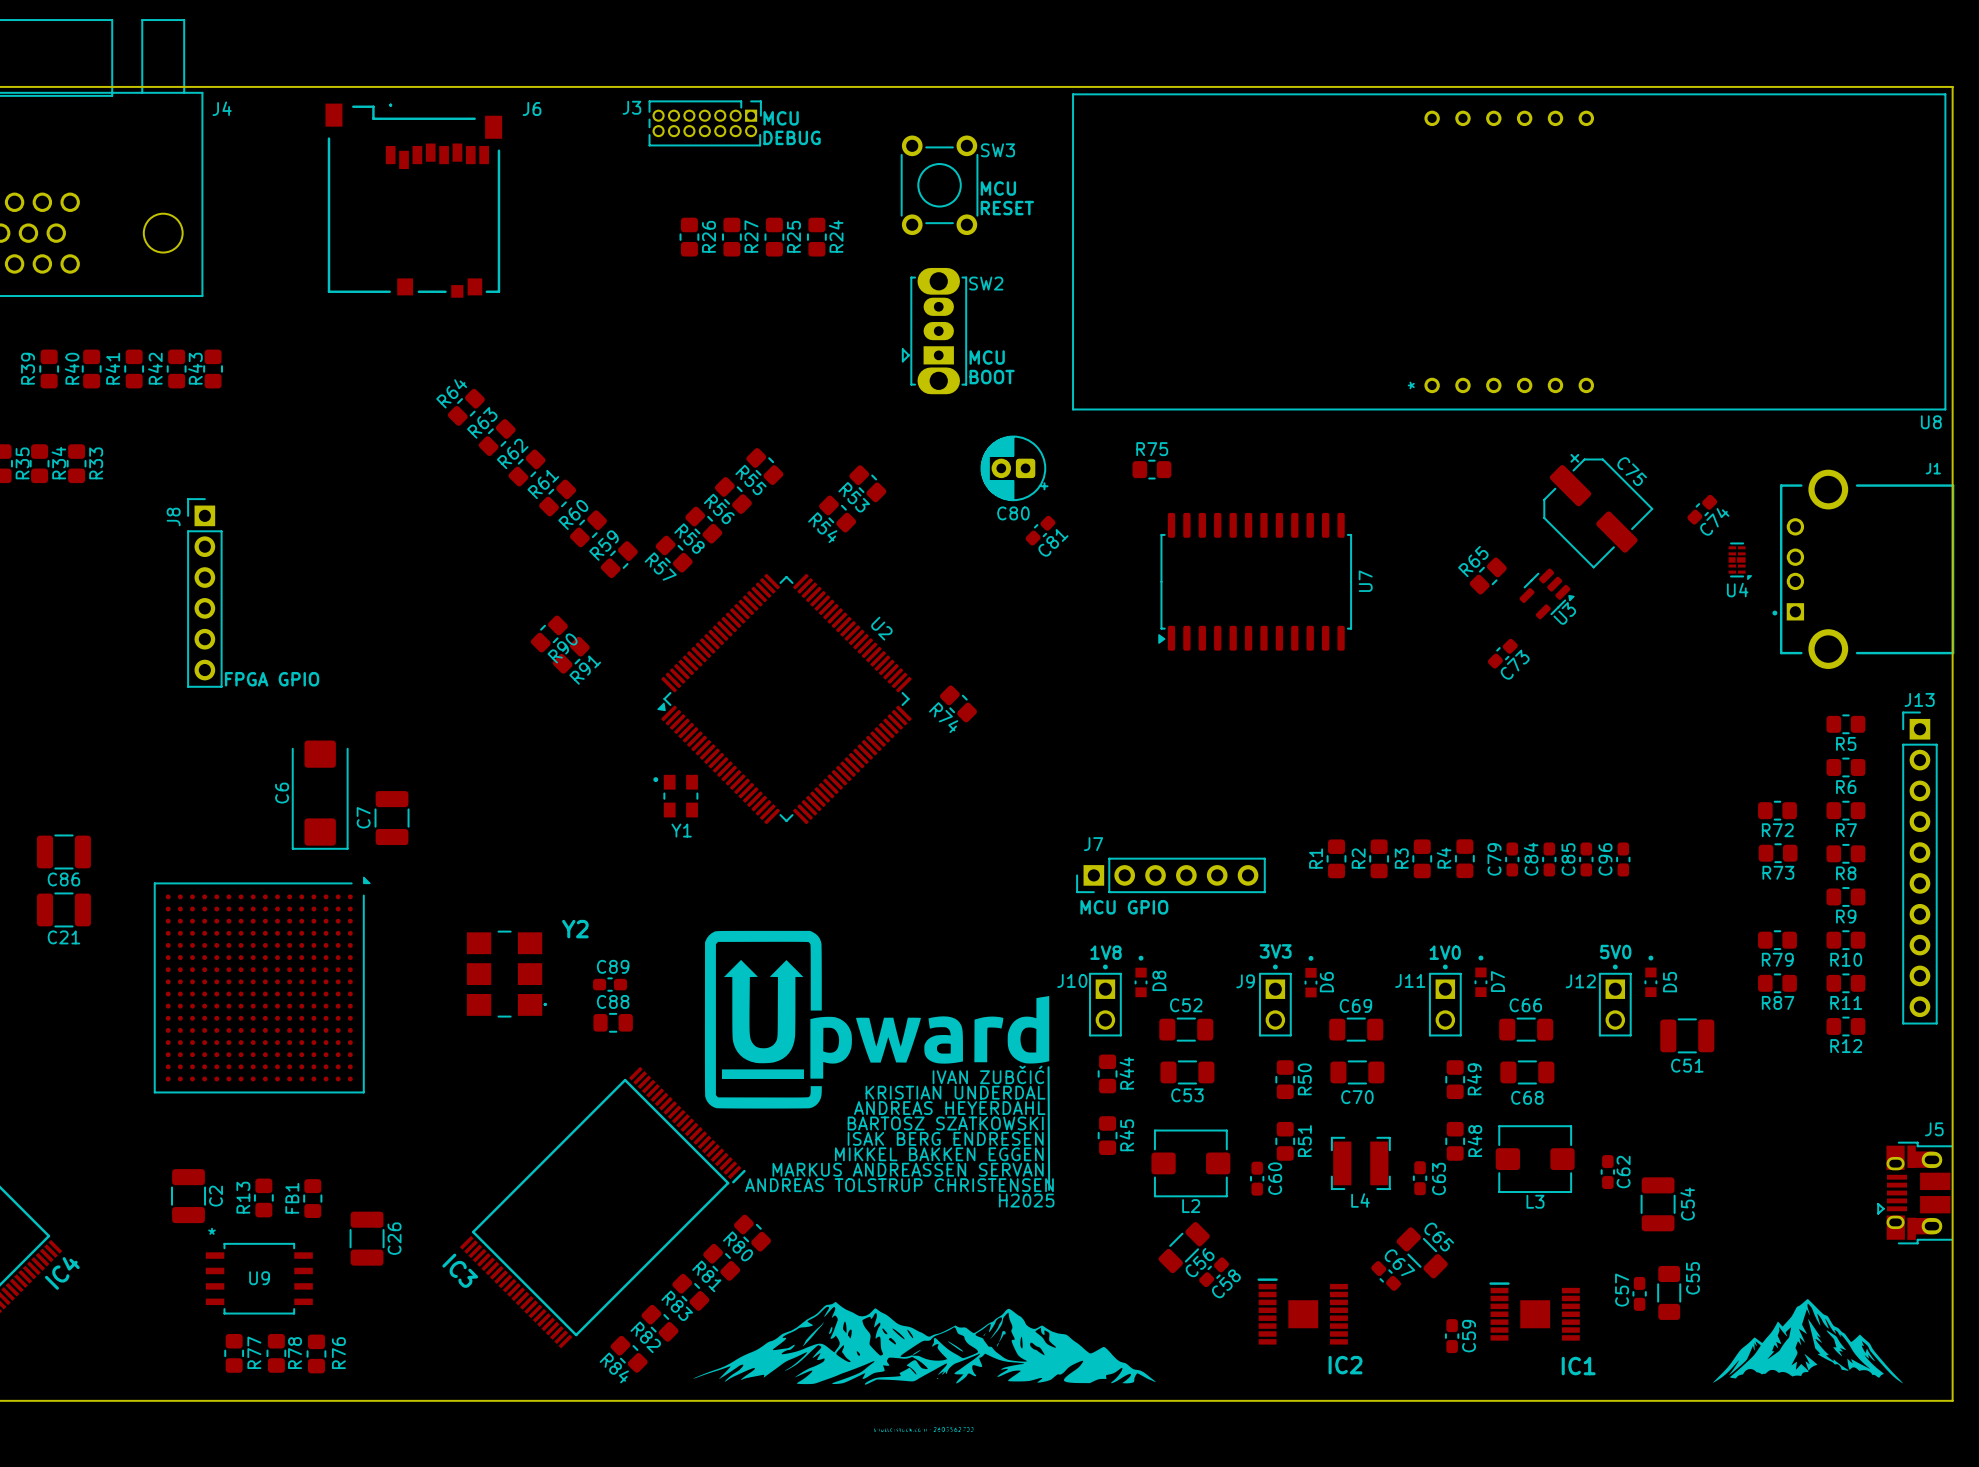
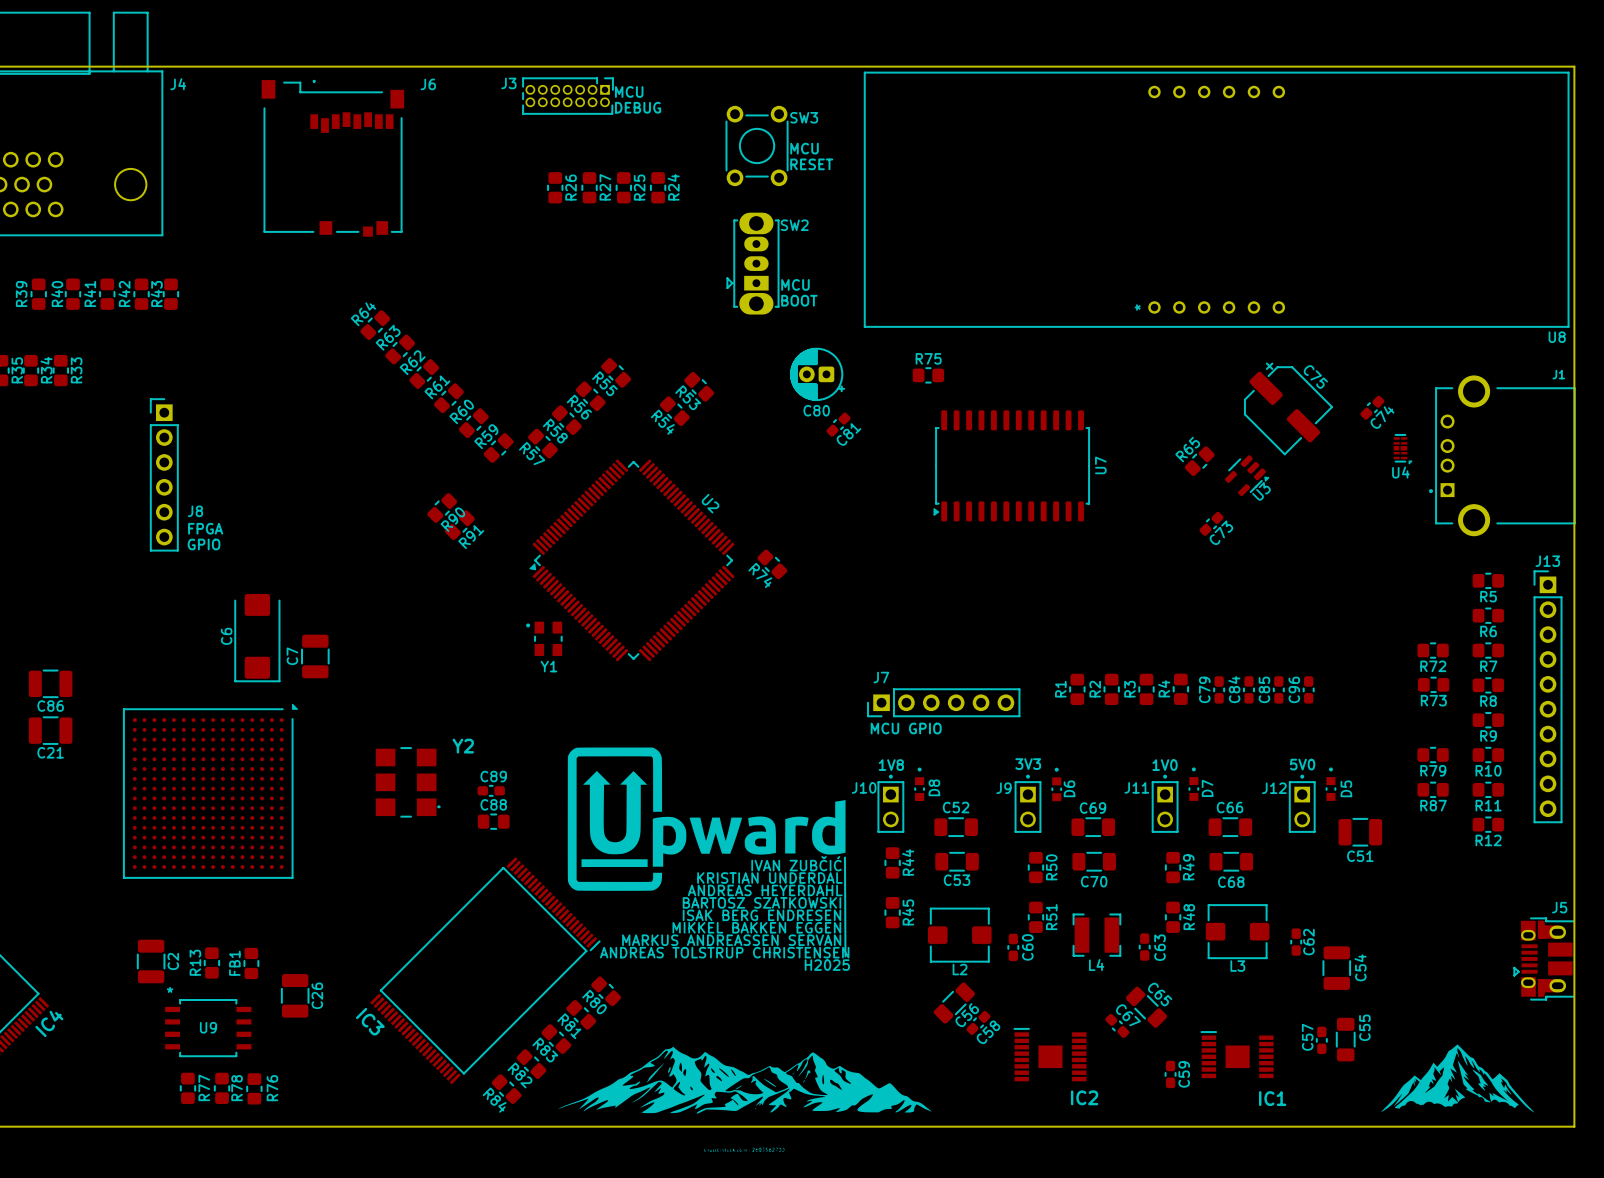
J8 name rotation: 0° (173, 516) -> 90° clockwise (195, 511)
J8 name position: J8 (173, 516) -> J8 (195, 511)
text: none -> FPGA (205, 528)
text: FPGA GPIO (272, 679) -> GPIO (204, 544)

